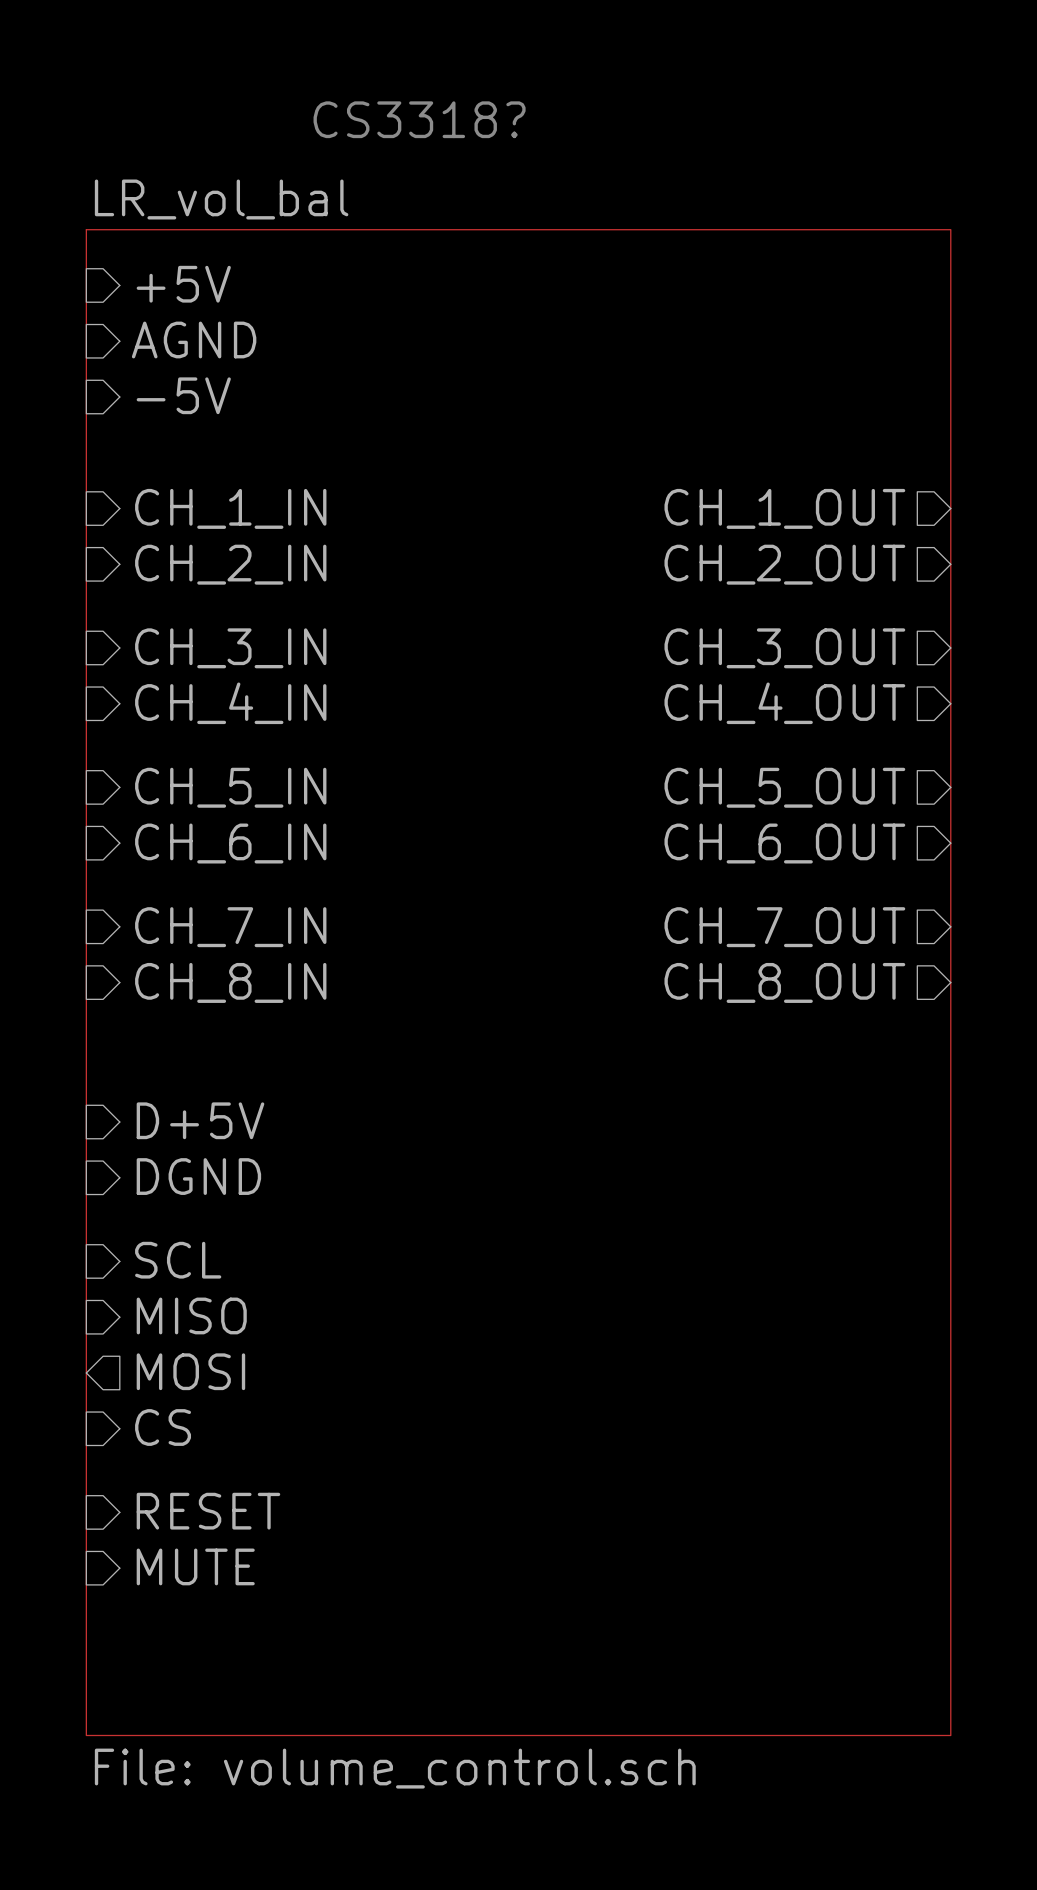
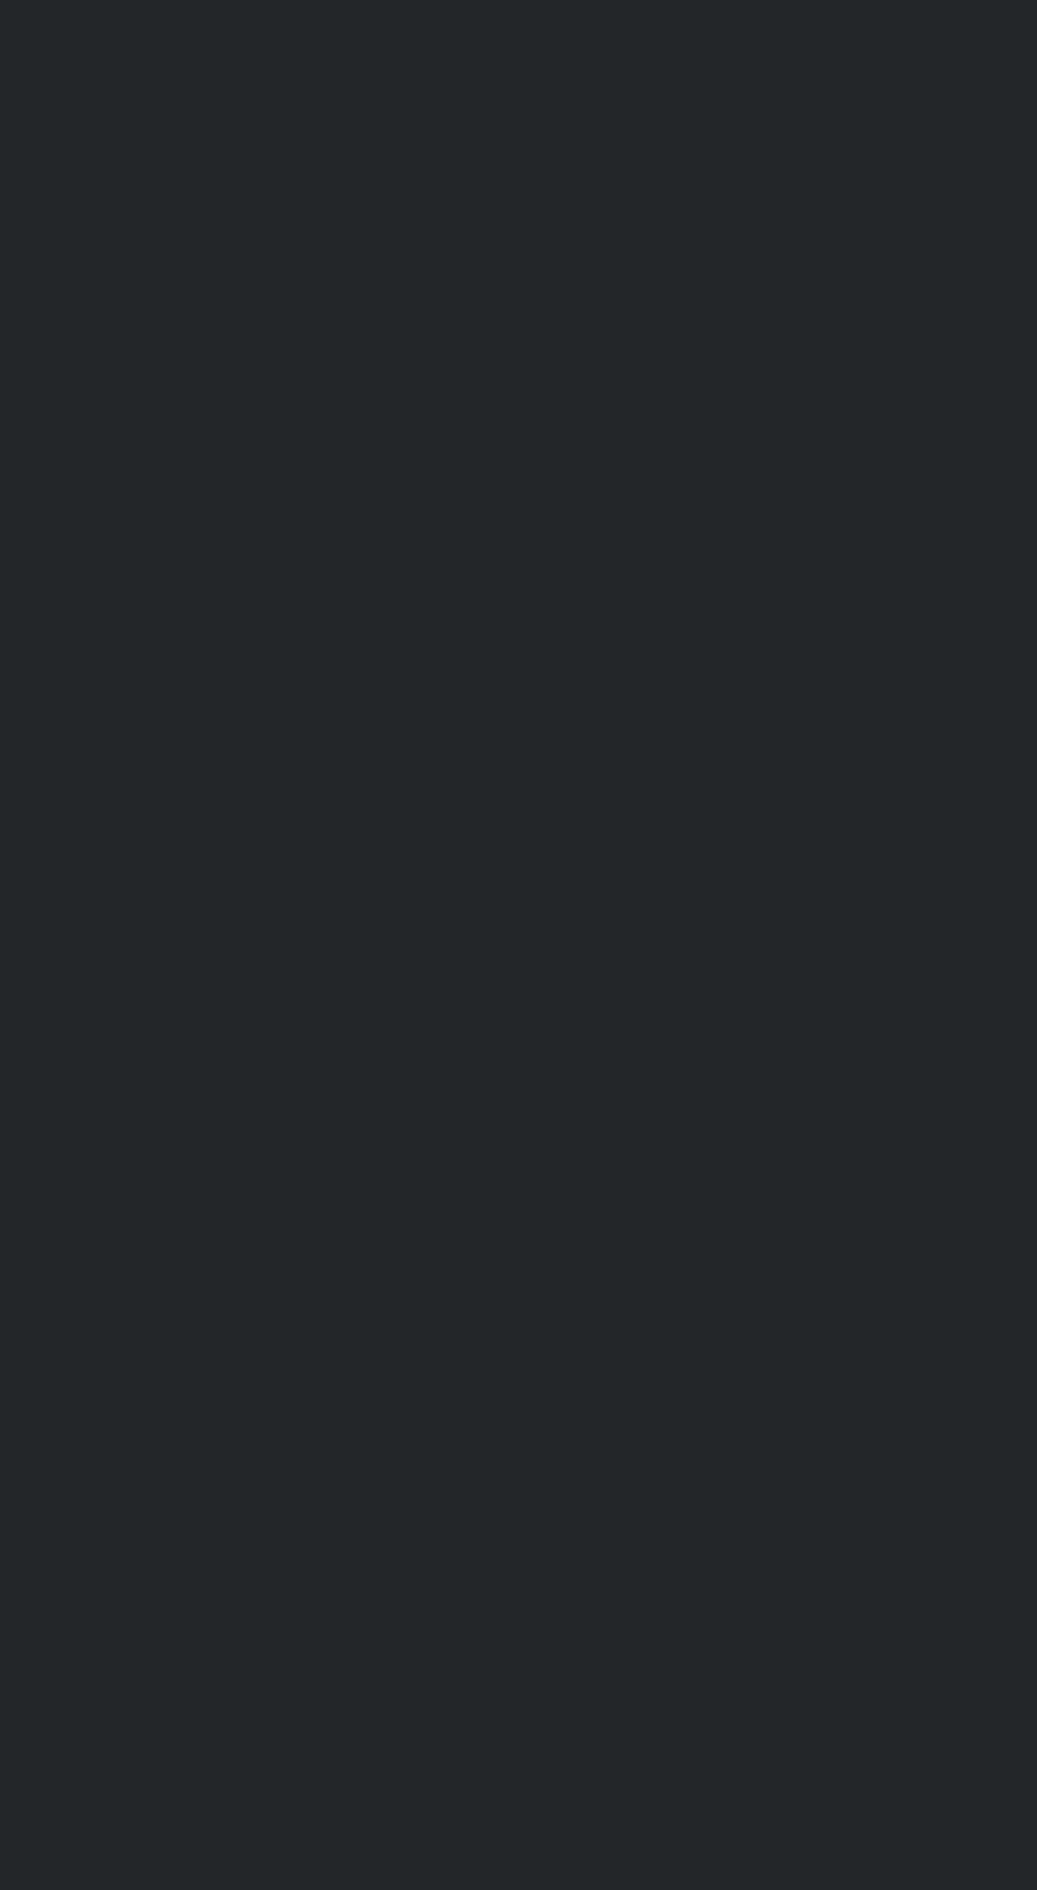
text: CS3318? (419, 119) -> none
sheet pin: +5V (183, 284) -> none
sheet pin: AGND (194, 339) -> none
sheet pin: -5V (183, 395) -> none
sheet pin: CH_1_IN (230, 508) -> none
sheet pin: CH_1_OUT (784, 508) -> none
sheet pin: CH_2_IN (230, 564) -> none
sheet pin: CH_2_OUT (784, 564) -> none
sheet pin: CH_3_IN (230, 648) -> none
sheet pin: CH_3_OUT (784, 648) -> none
sheet pin: CH_4_IN (230, 703) -> none
sheet pin: CH_4_OUT (784, 703) -> none
sheet pin: CH_5_IN (230, 787) -> none
sheet pin: CH_5_OUT (784, 787) -> none
sheet pin: CH_6_IN (230, 843) -> none
sheet pin: CH_6_OUT (784, 843) -> none
sheet pin: CH_7_IN (230, 927) -> none
sheet pin: CH_7_OUT (784, 927) -> none
sheet pin: CH_8_IN (230, 982) -> none
sheet LR_vol_bal: File: volume_control.sch (518, 982) -> none
sheet pin: CH_8_OUT (784, 982) -> none
sheet pin: D+5V (200, 1120) -> none
sheet pin: DGND (198, 1176) -> none
sheet pin: SCL (178, 1260) -> none
sheet pin: MISO (191, 1315) -> none
sheet pin: MOSI (190, 1371) -> none
sheet pin: CS (163, 1427) -> none
sheet pin: RESET (208, 1511) -> none
sheet pin: MUTE (195, 1566) -> none

